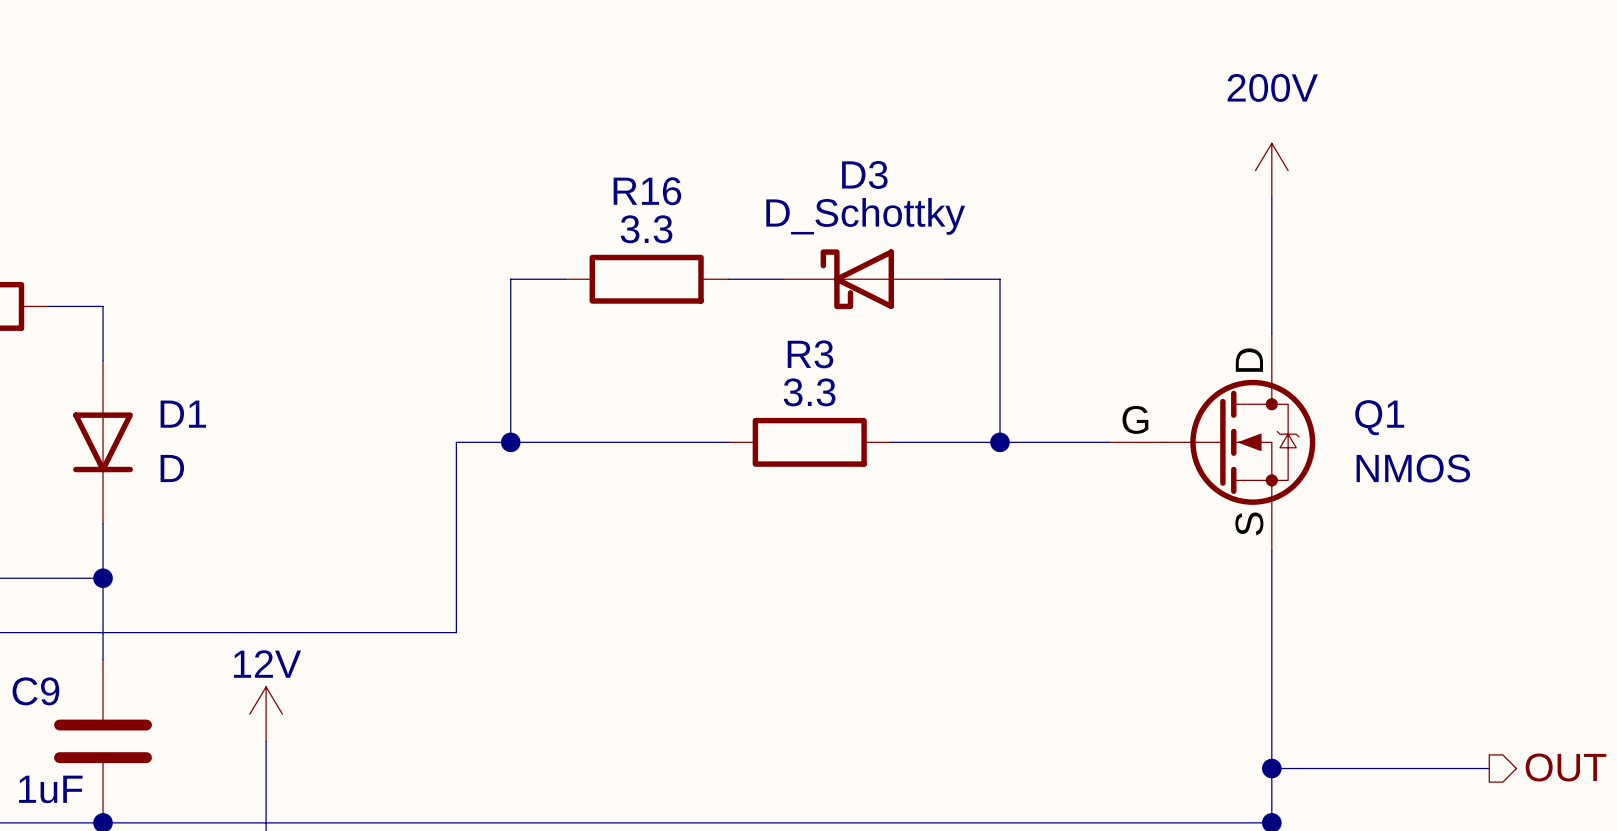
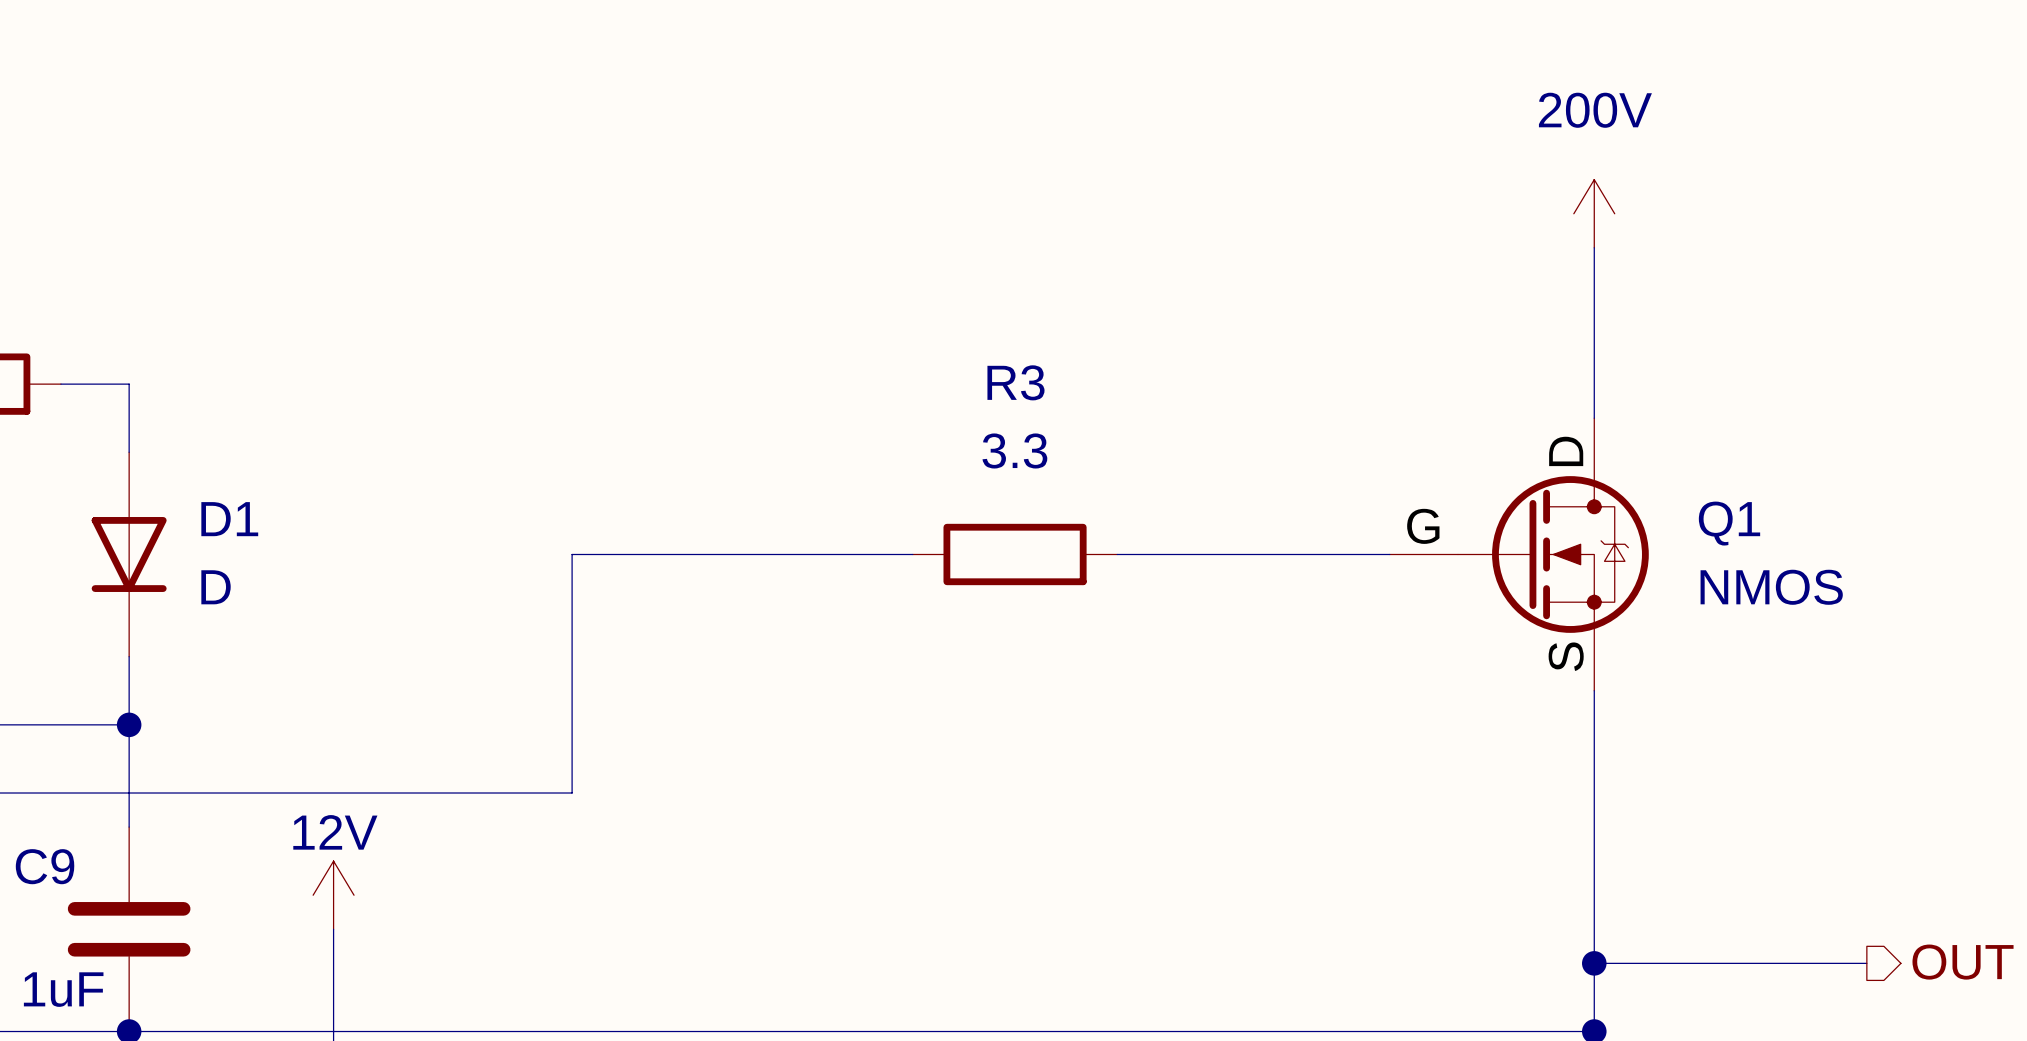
wire: (565, 279) (510, 279) (510, 442) -> none
R16: 3.3 (646, 279) -> none
wire: (728, 279) (782, 279) -> none
D3: D_Schottky (864, 279) -> none
wire: (945, 279) (1000, 279) (1000, 442) -> none
R3 name position: R3 (810, 354) -> R3 (1015, 382)
R3 value position: 3.3 (809, 392) -> 3.3 (1014, 450)
junction: (510, 442) -> none
junction: (1000, 442) -> none

